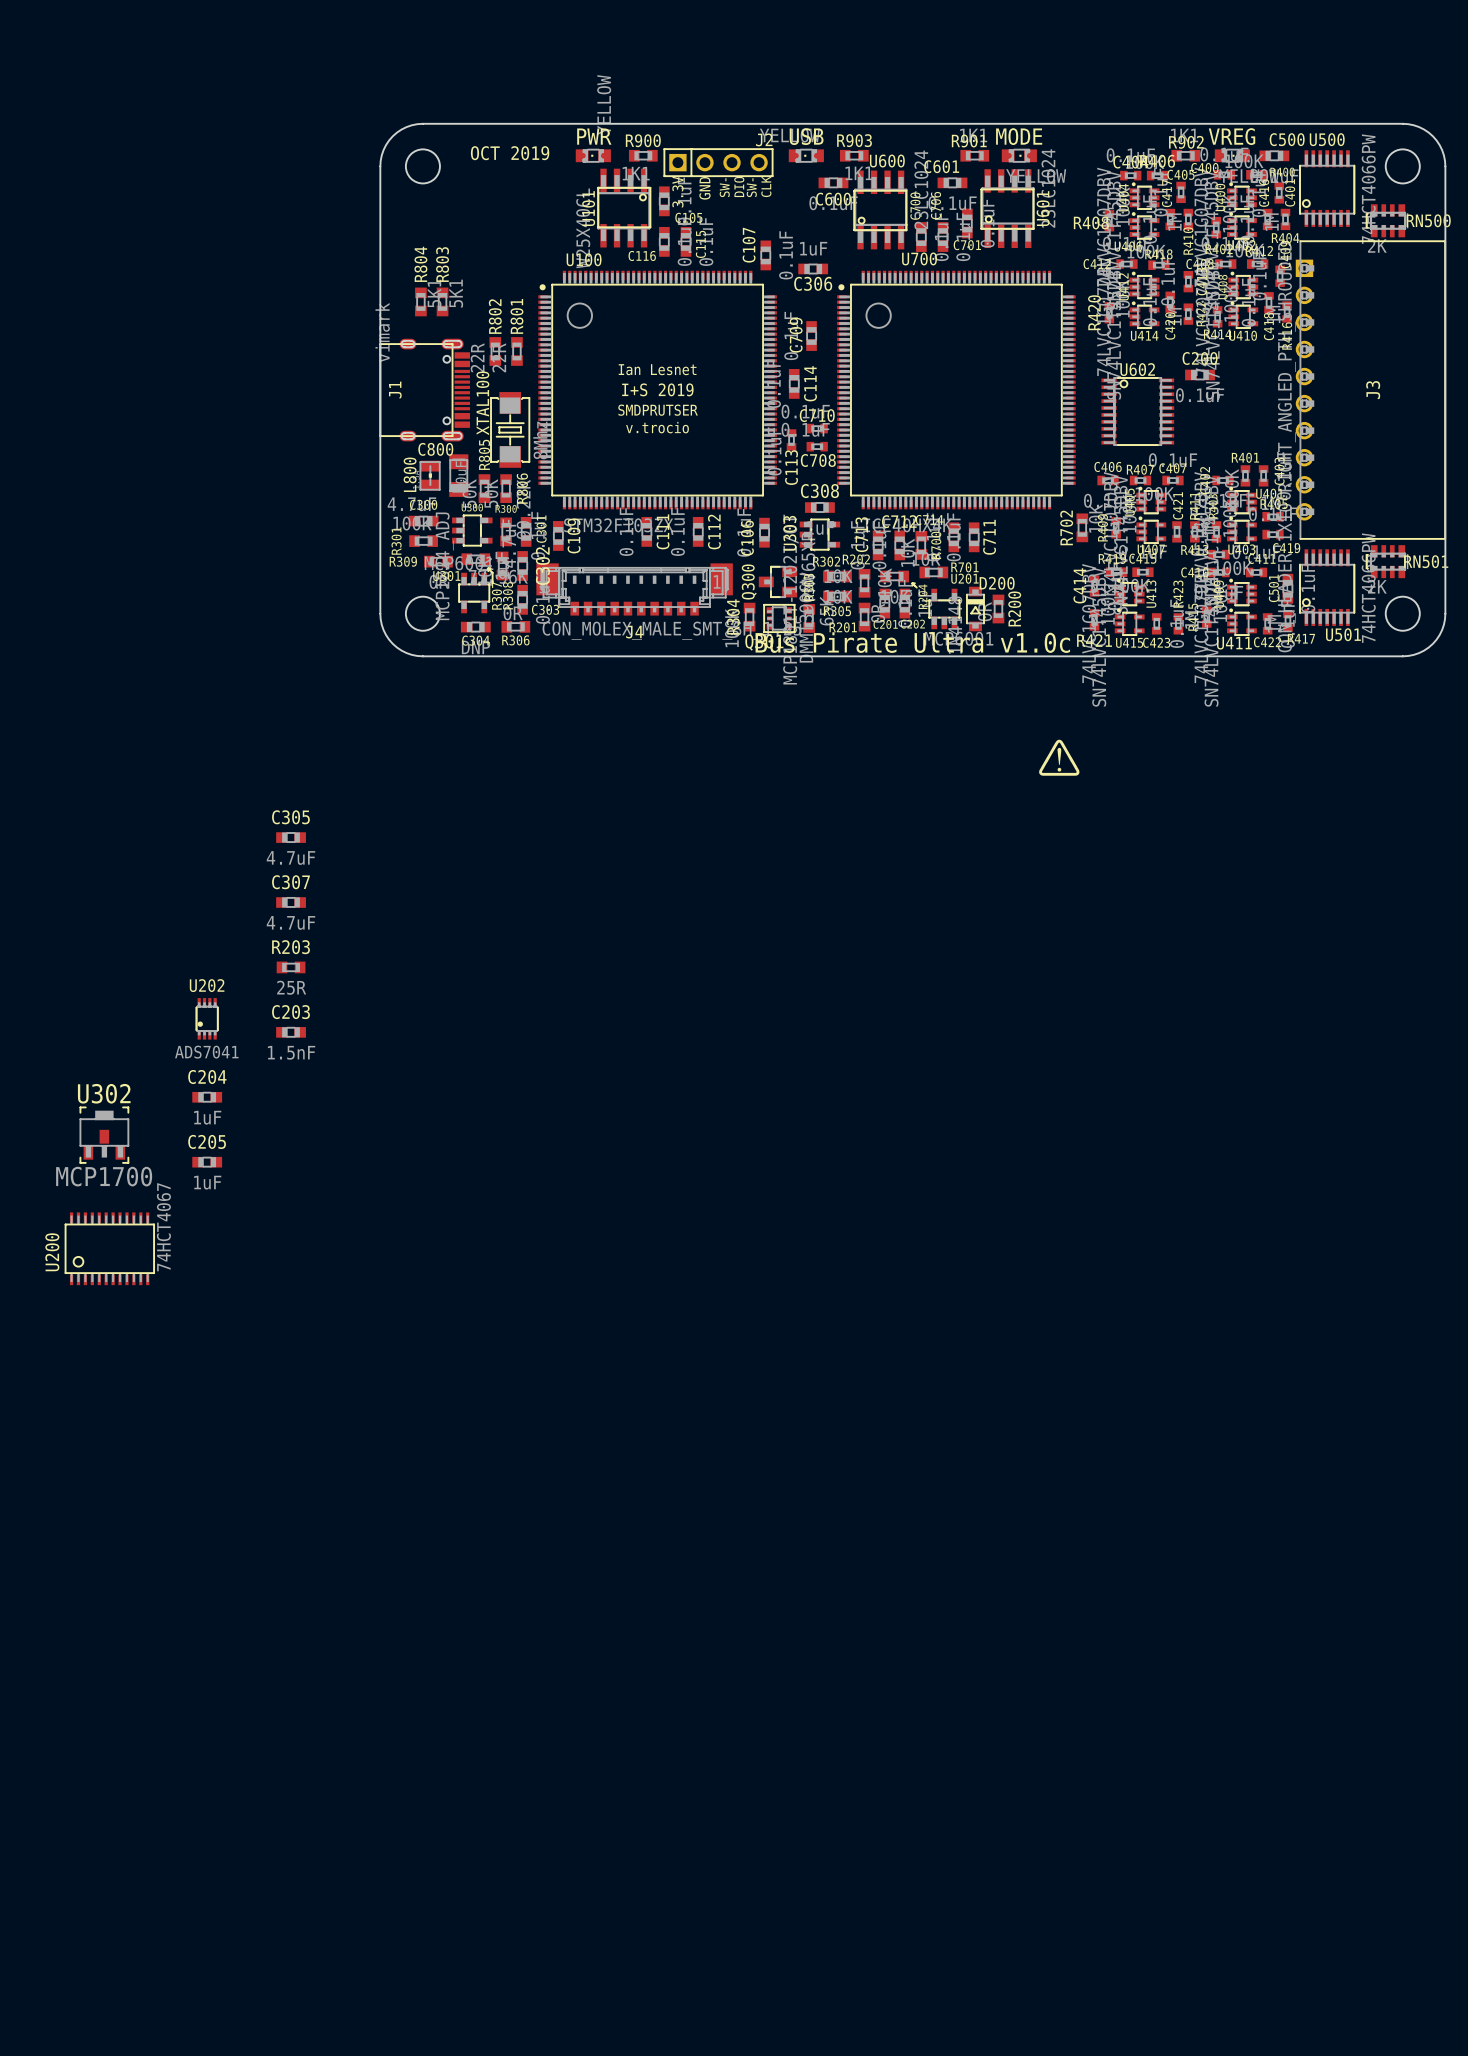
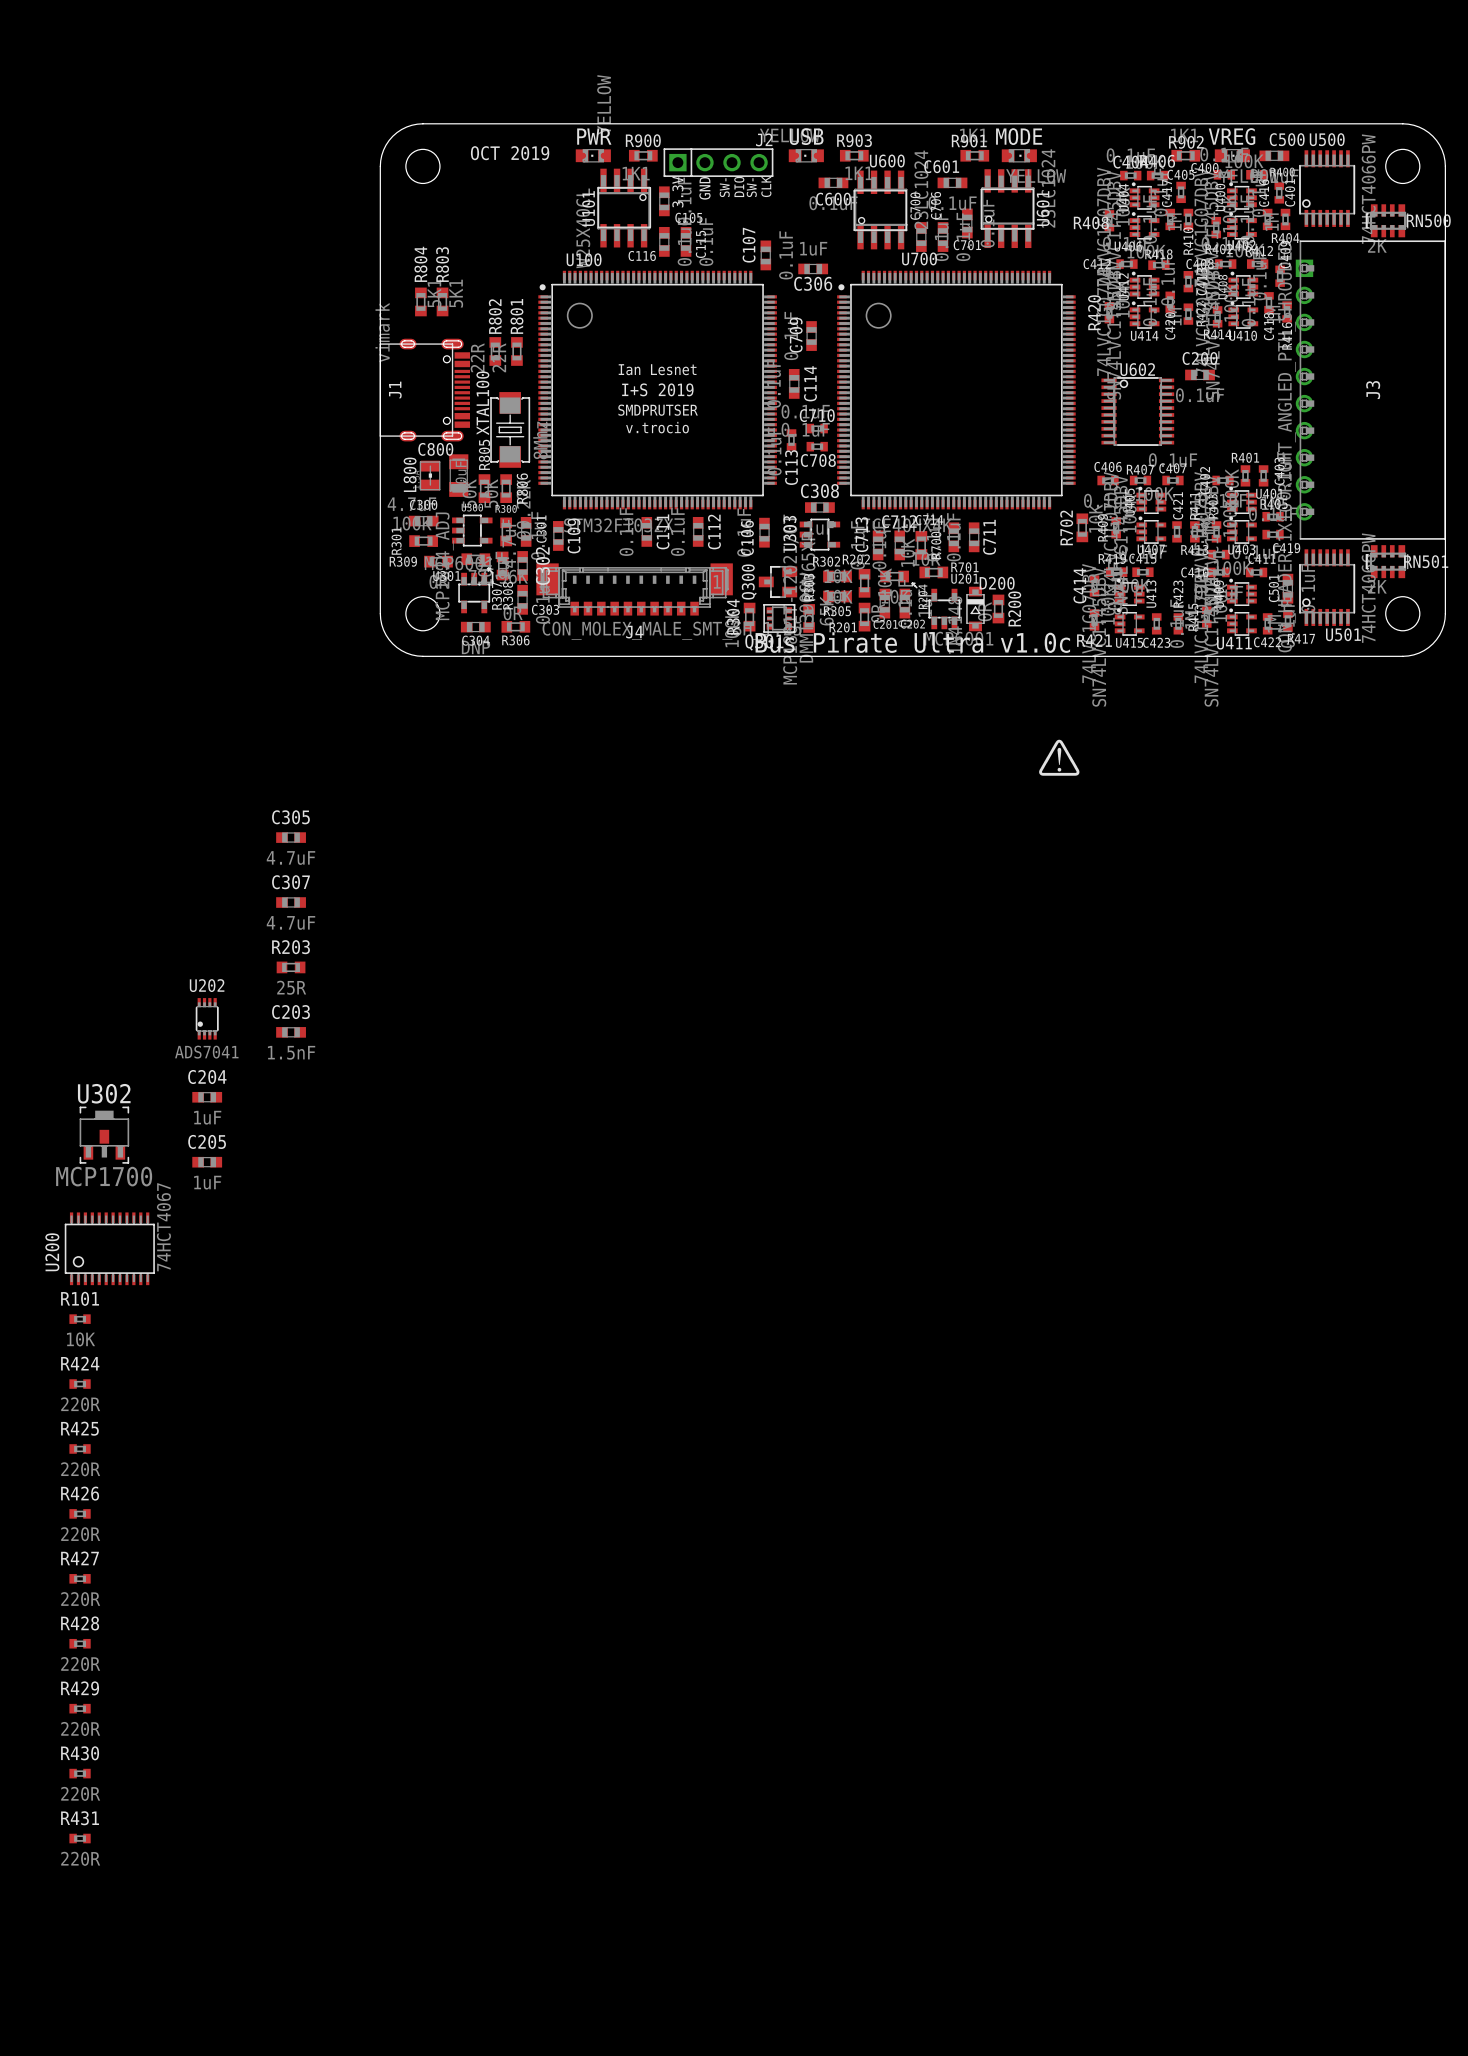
R101: none -> 10K (80, 1319)
R424: none -> 220R (80, 1384)
R425: none -> 220R (80, 1448)
R426: none -> 220R (80, 1513)
R427: none -> 220R (80, 1578)
R428: none -> 220R (80, 1643)
R429: none -> 220R (80, 1708)
R430: none -> 220R (80, 1773)
R431: none -> 220R (80, 1838)

